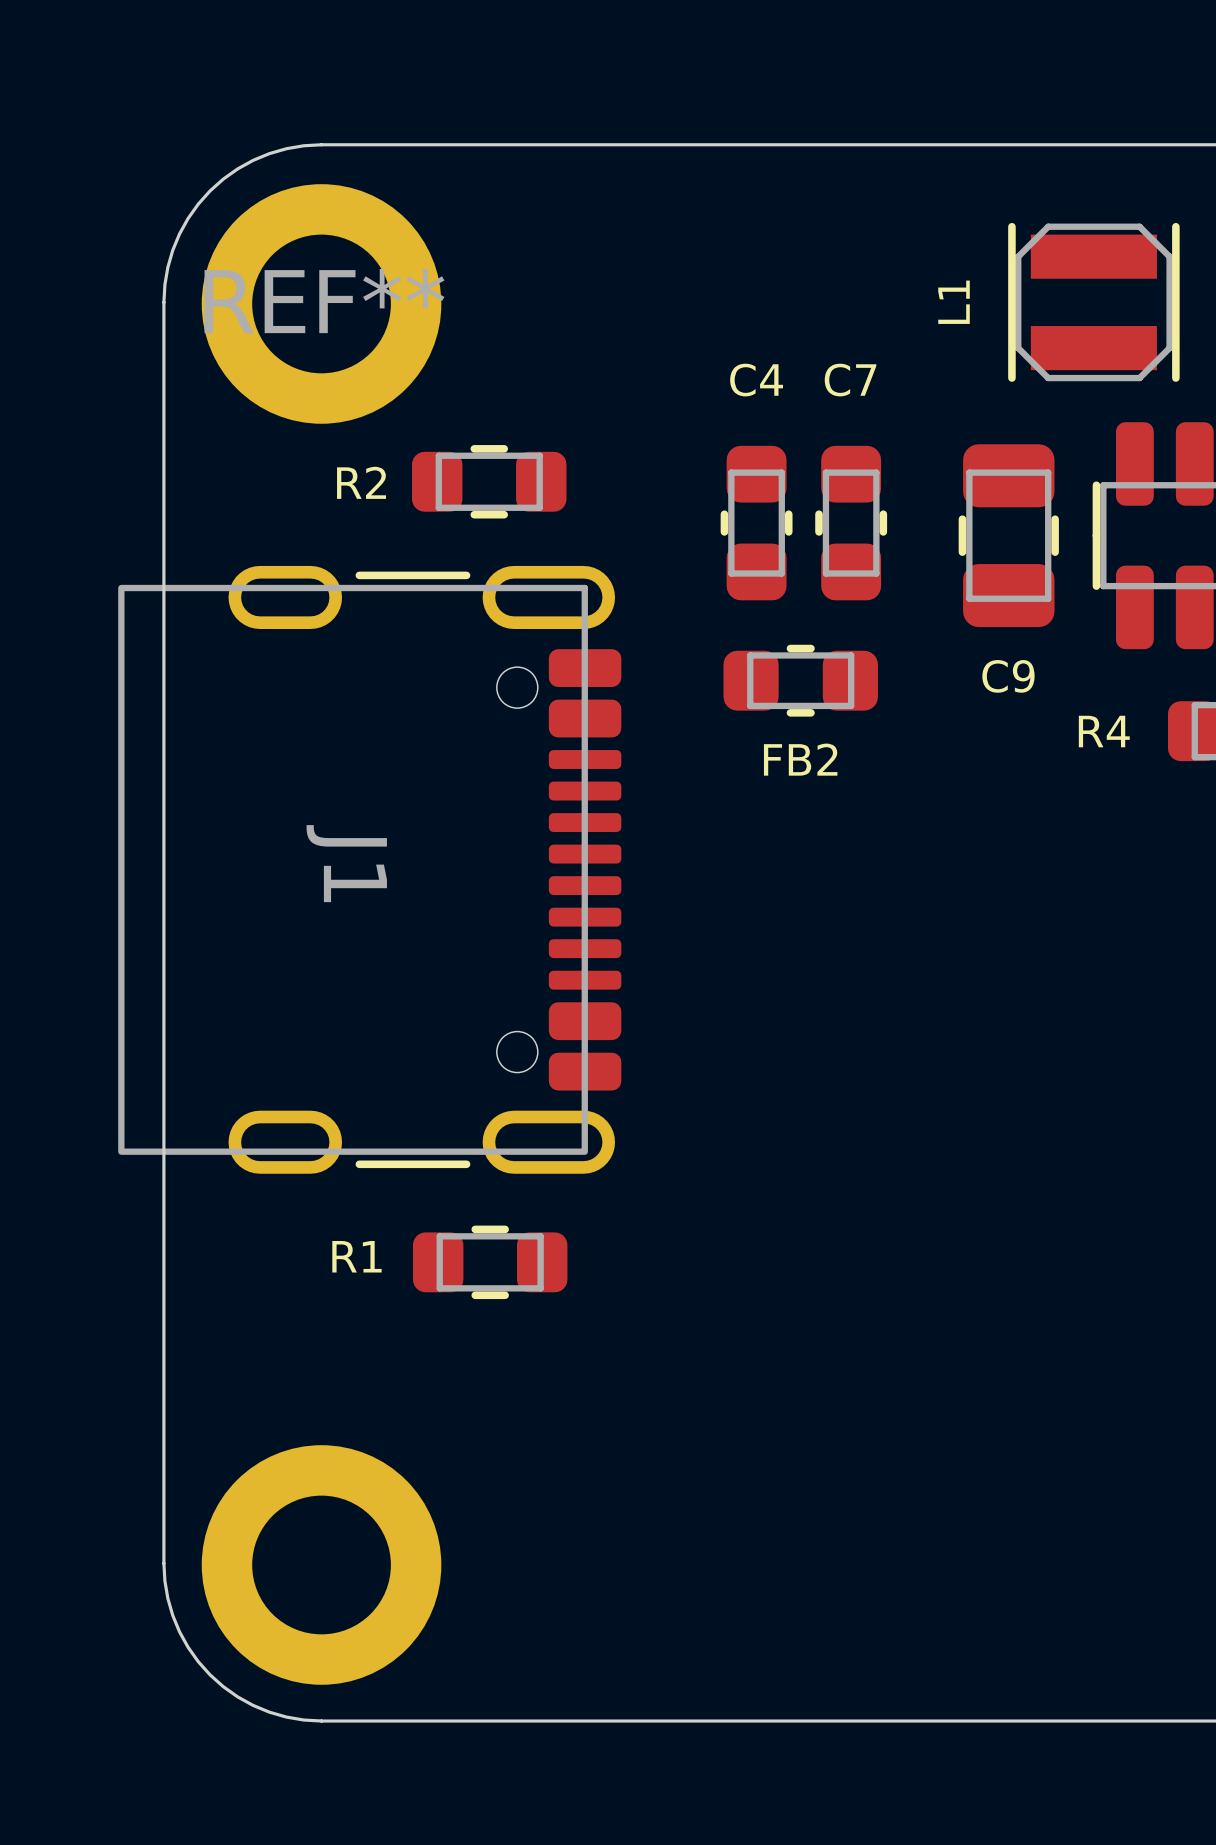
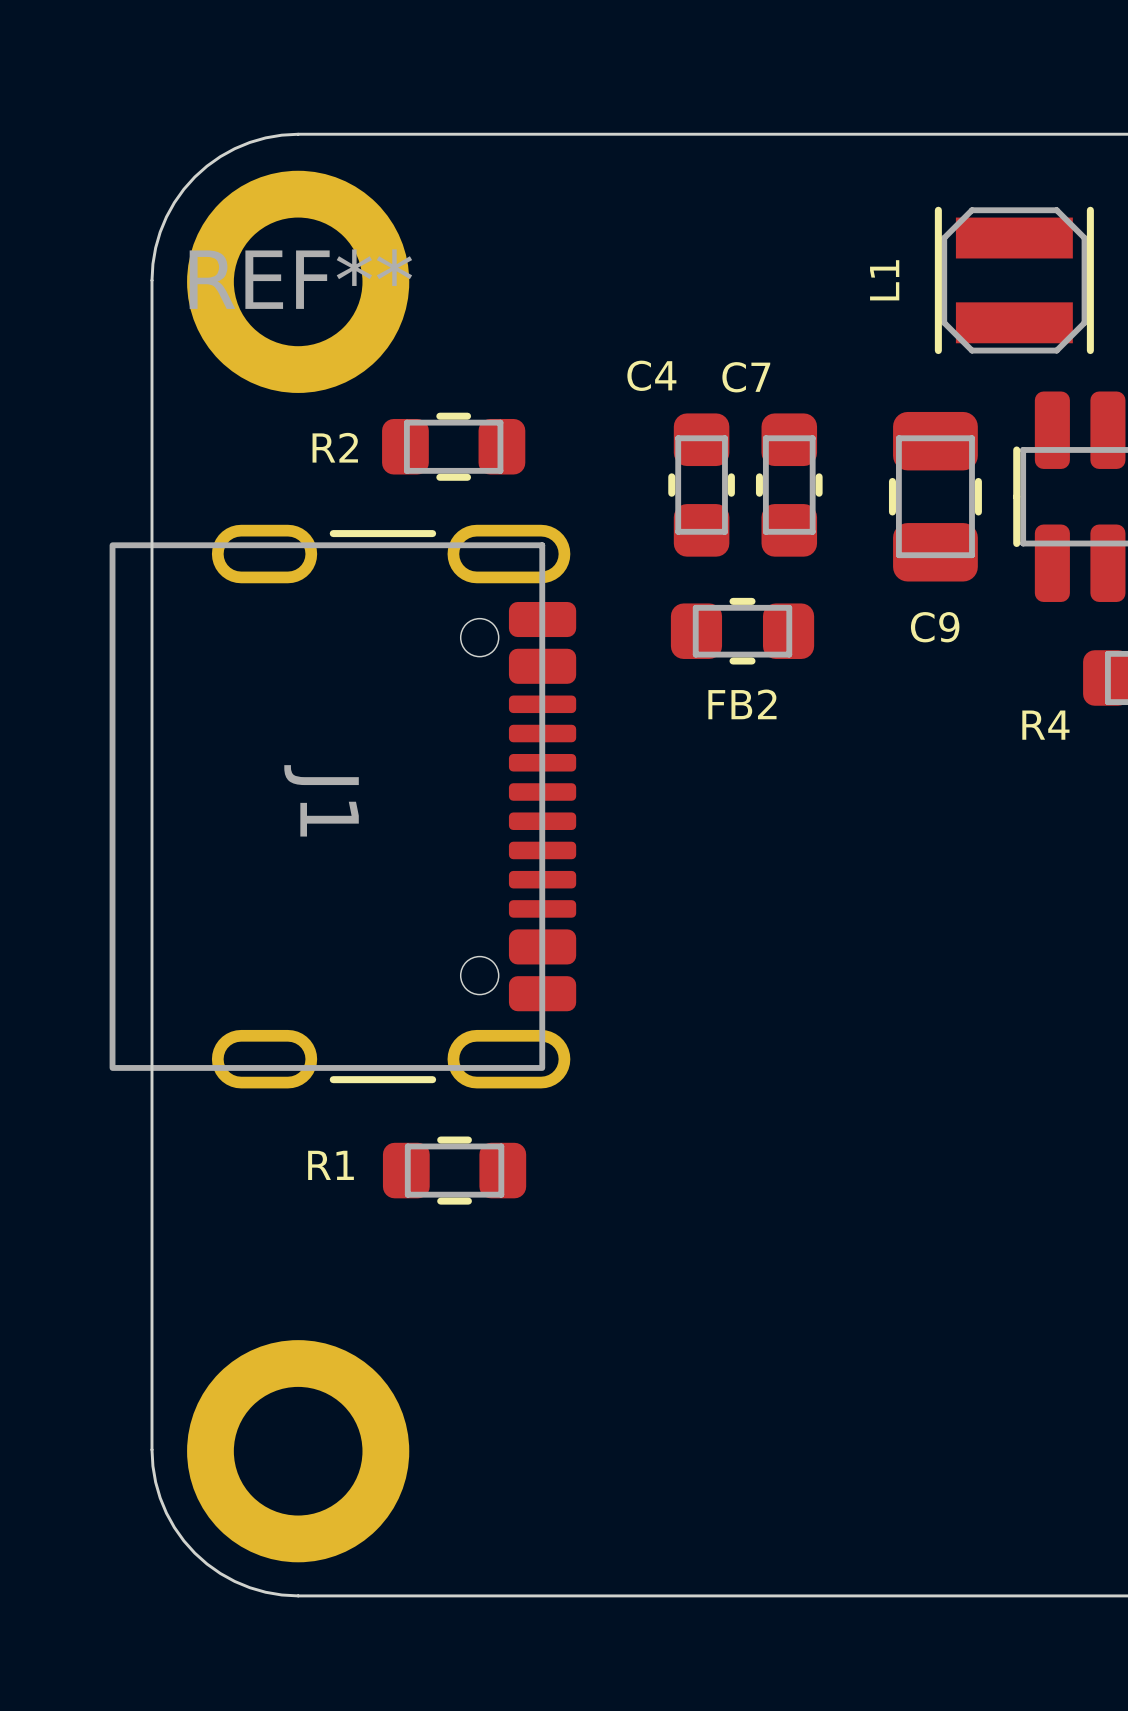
C4 name position: C4 (756, 380) -> C4 (651, 375)
C7 name position: C7 (850, 380) -> C7 (746, 377)
R4 name position: R4 (1104, 731) -> R4 (1045, 725)

